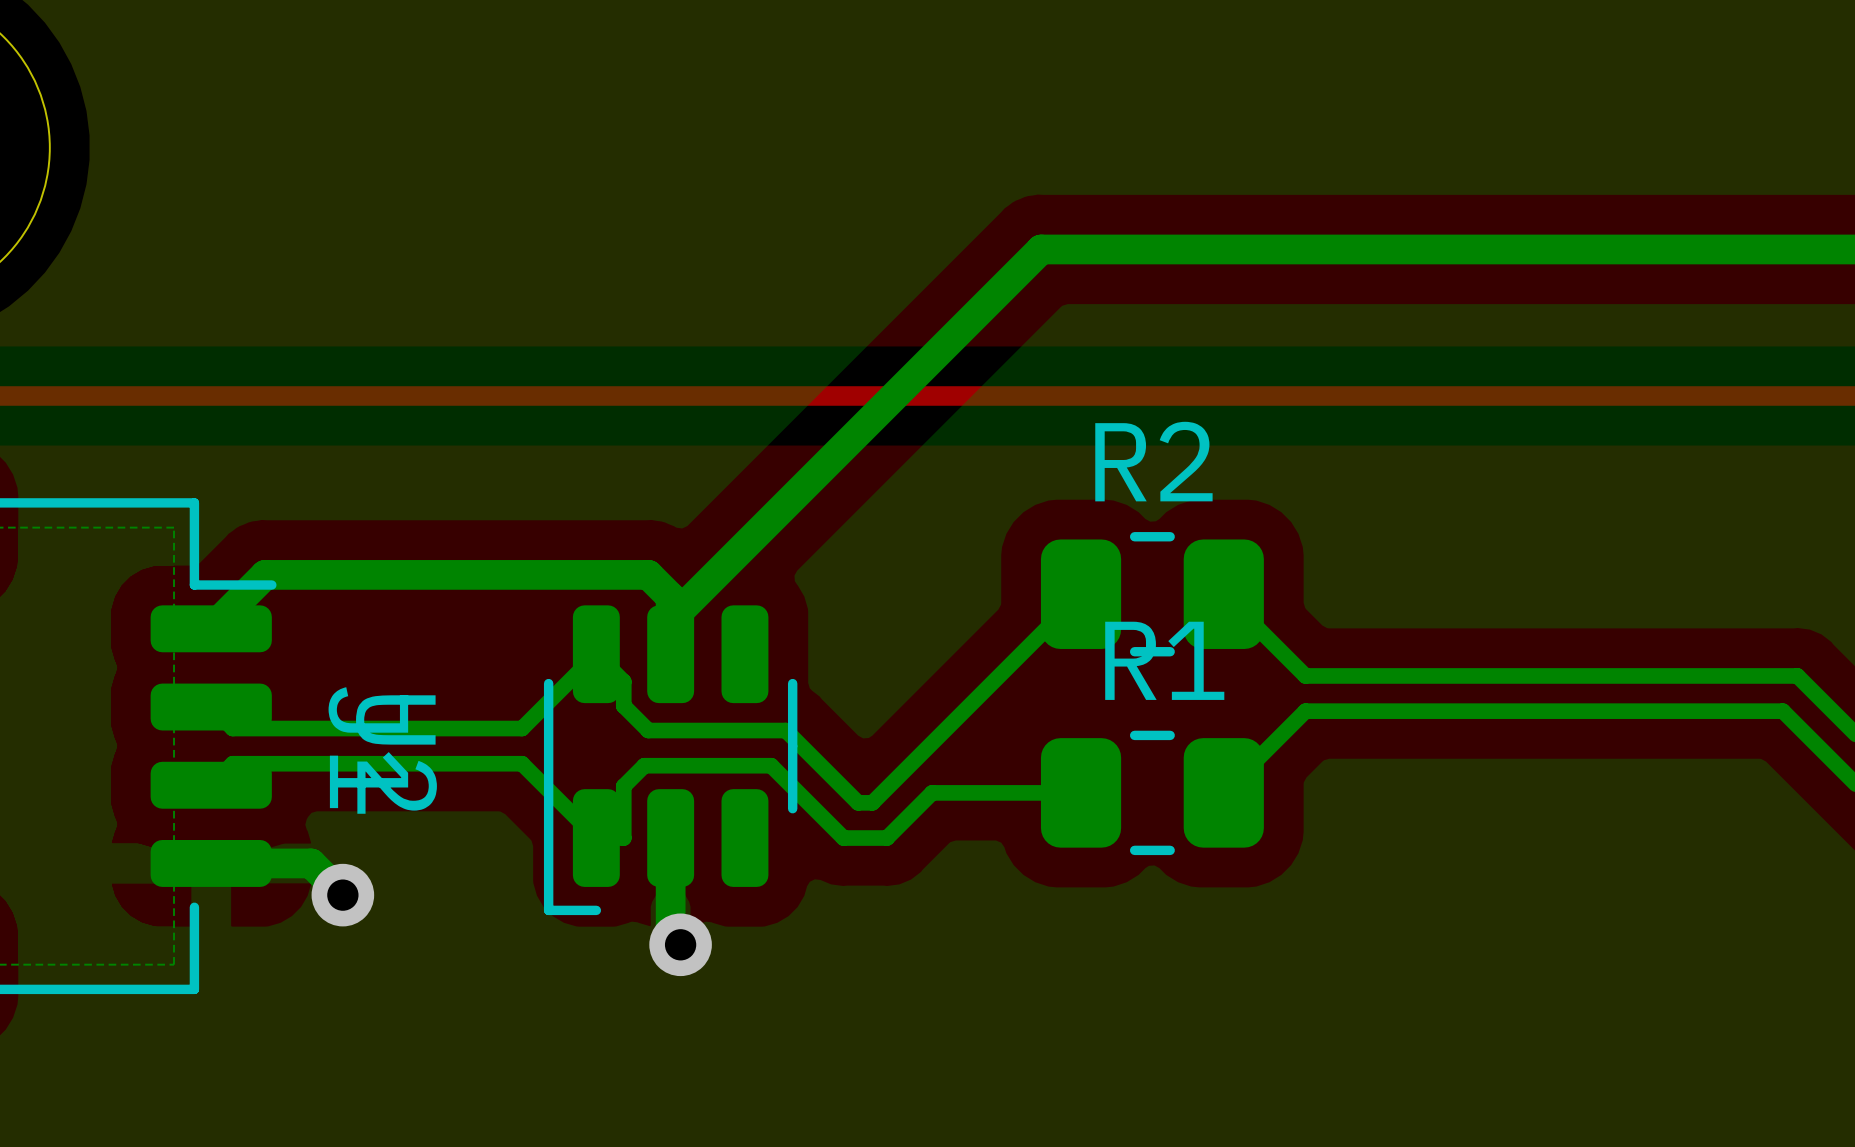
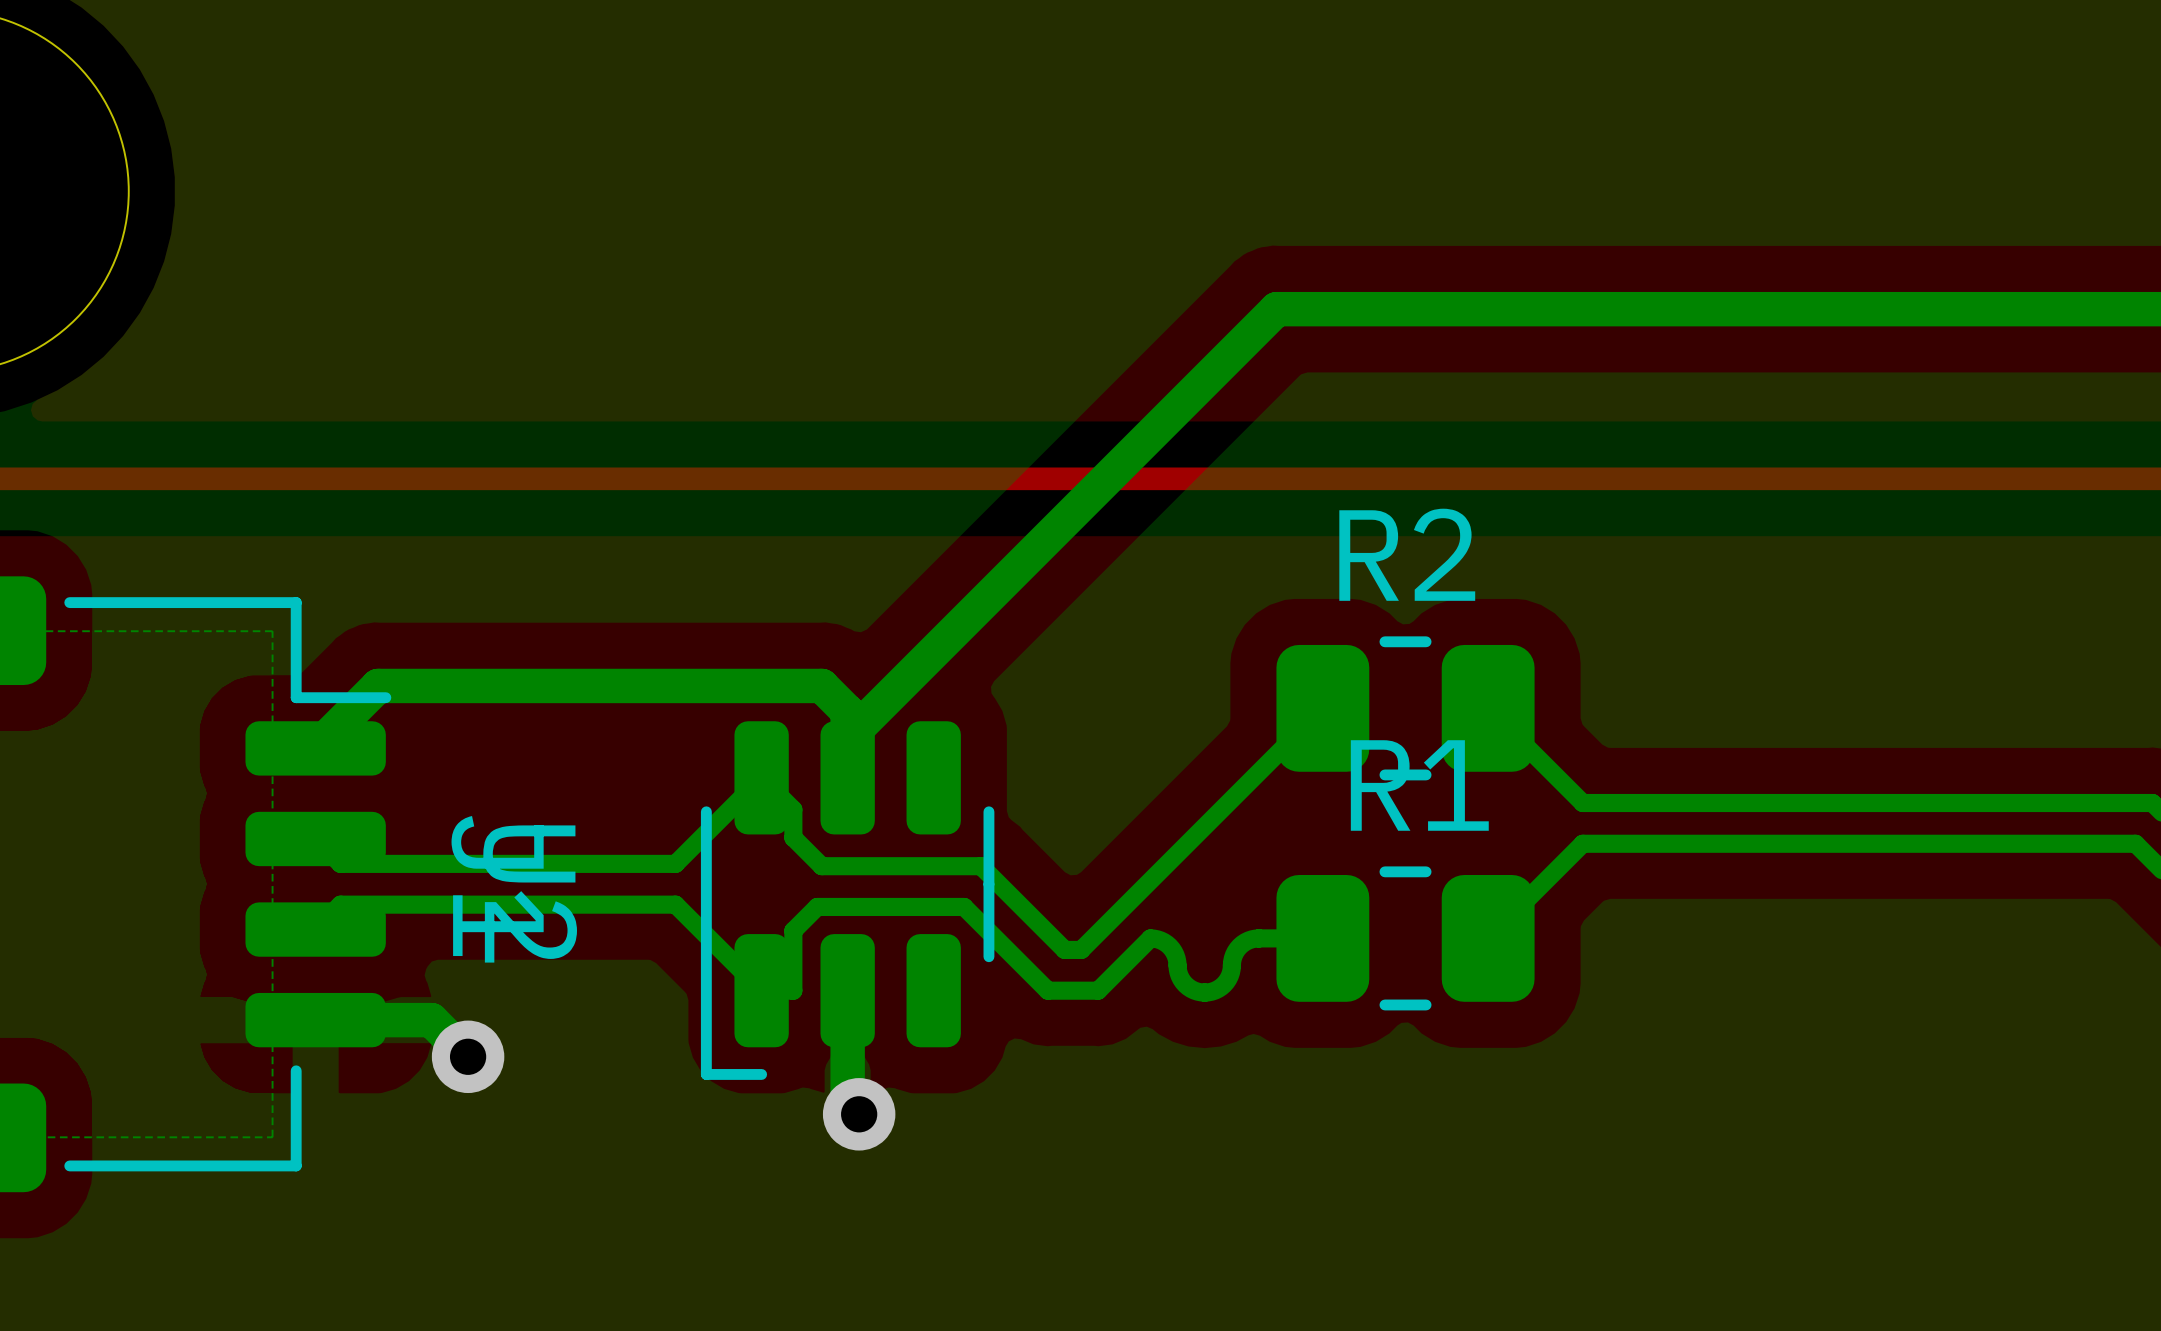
bottom track: (1025, 792) (932, 792) -> (1258, 938) (1248, 940) (1239, 946) (1233, 955) (1230, 972) (1226, 981) (1218, 988) (1204, 992) (1194, 990) (1185, 984) (1179, 975) (1176, 958) (1171, 949) (1160, 940) (1150, 938)

